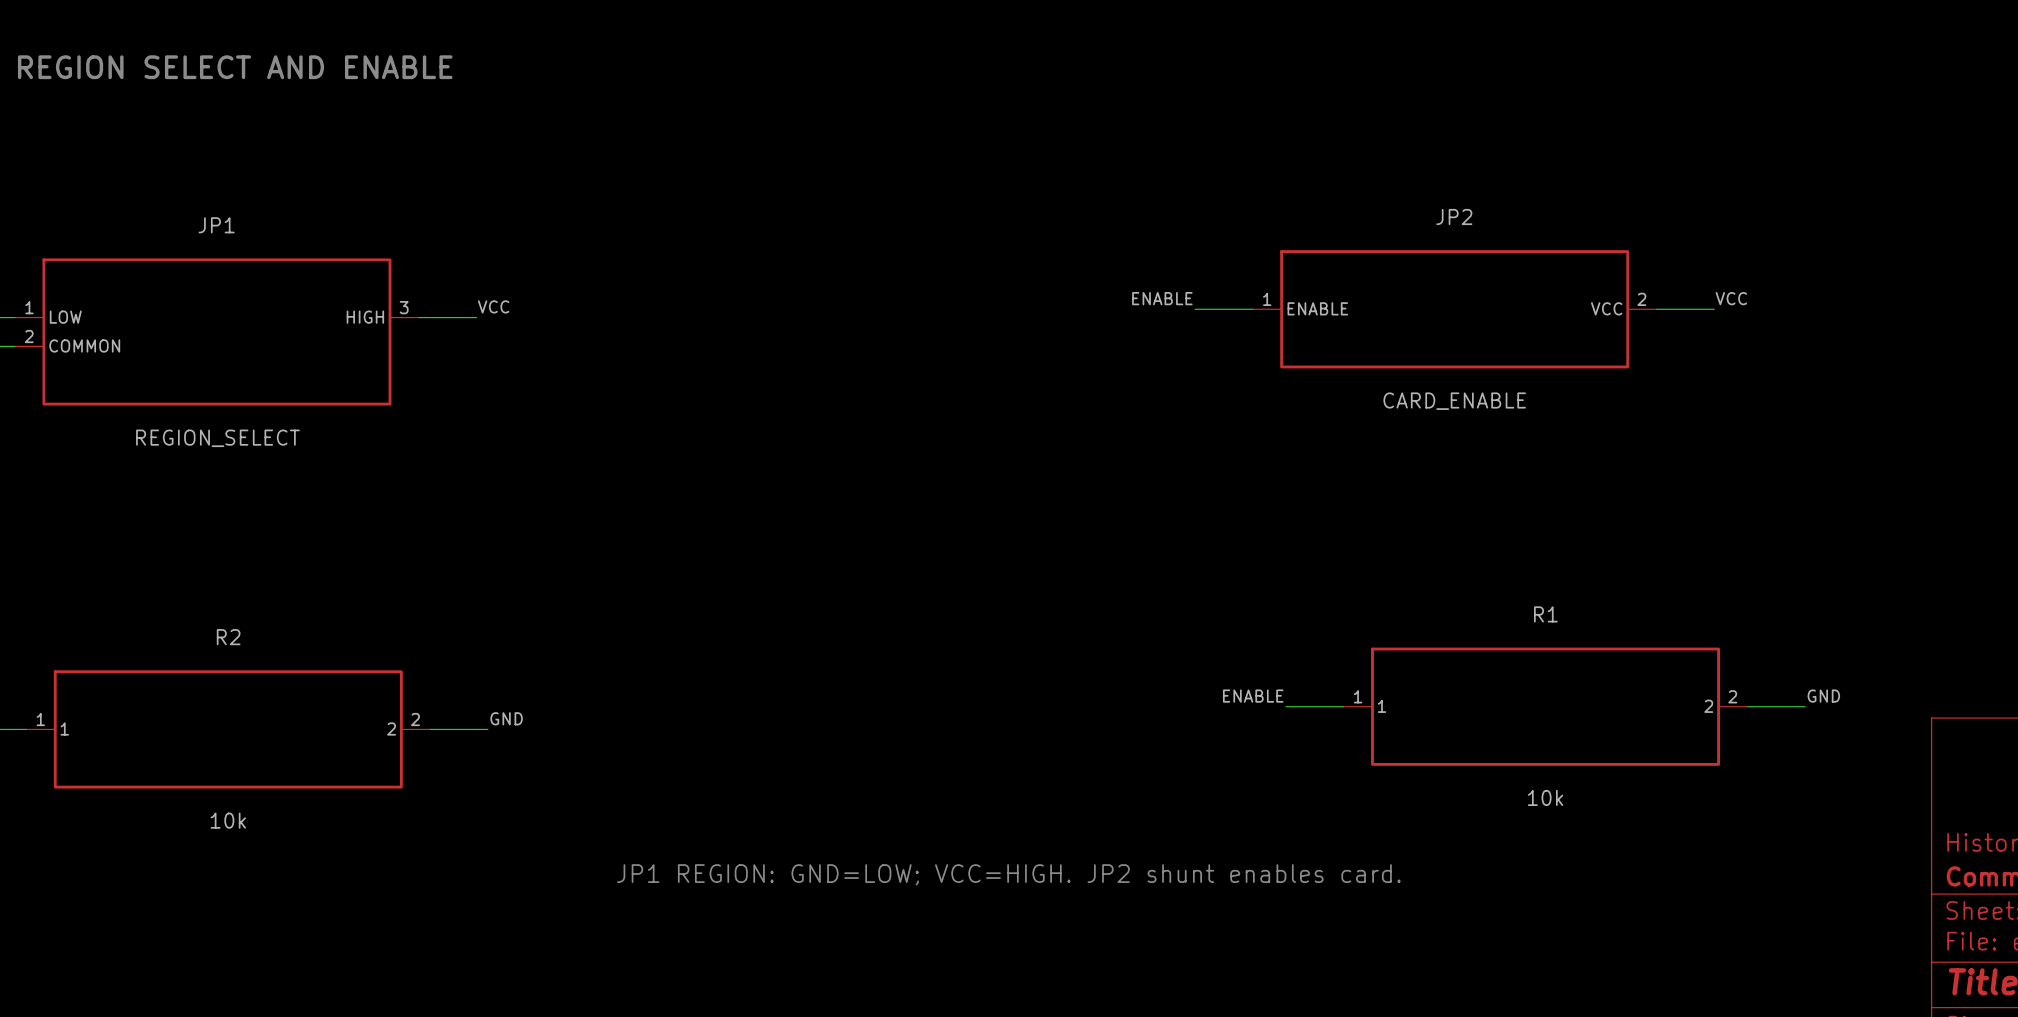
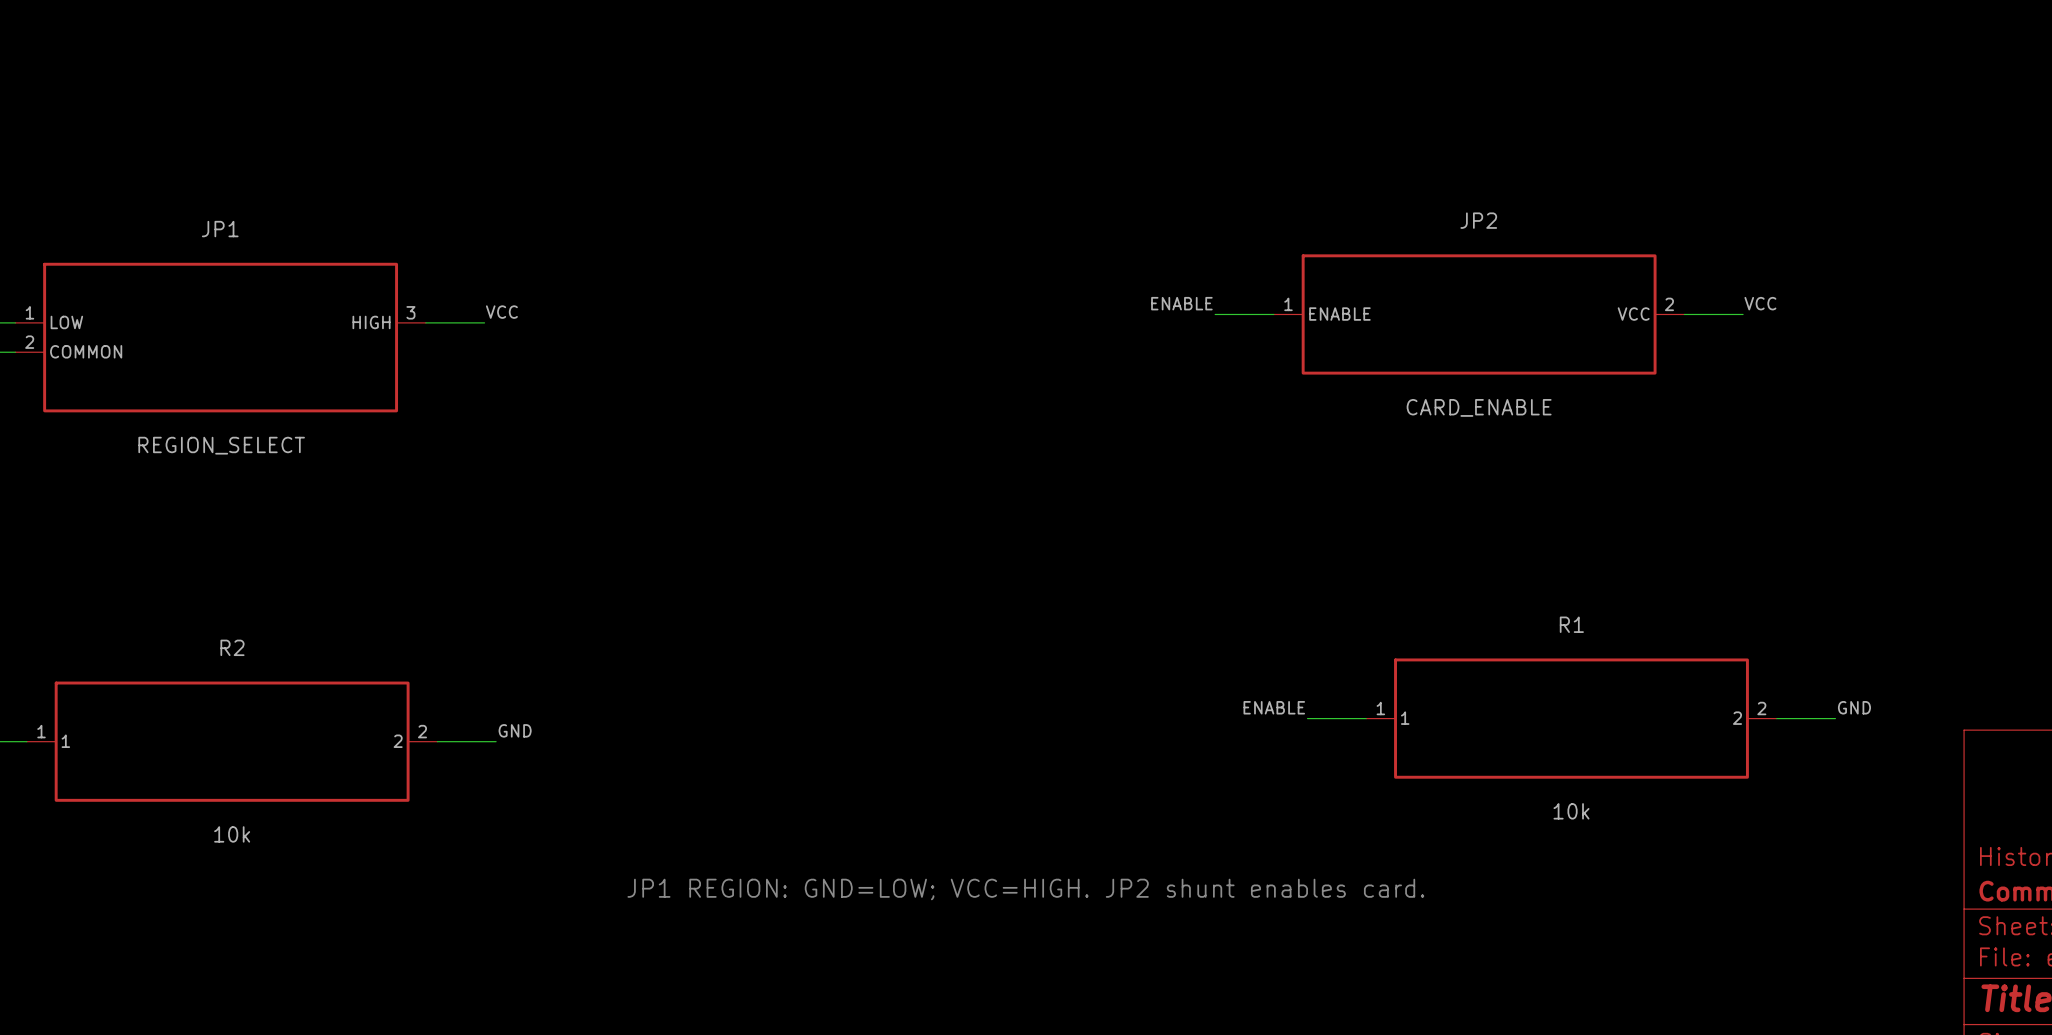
text: REGION SELECT AND ENABLE (235, 67) -> none

